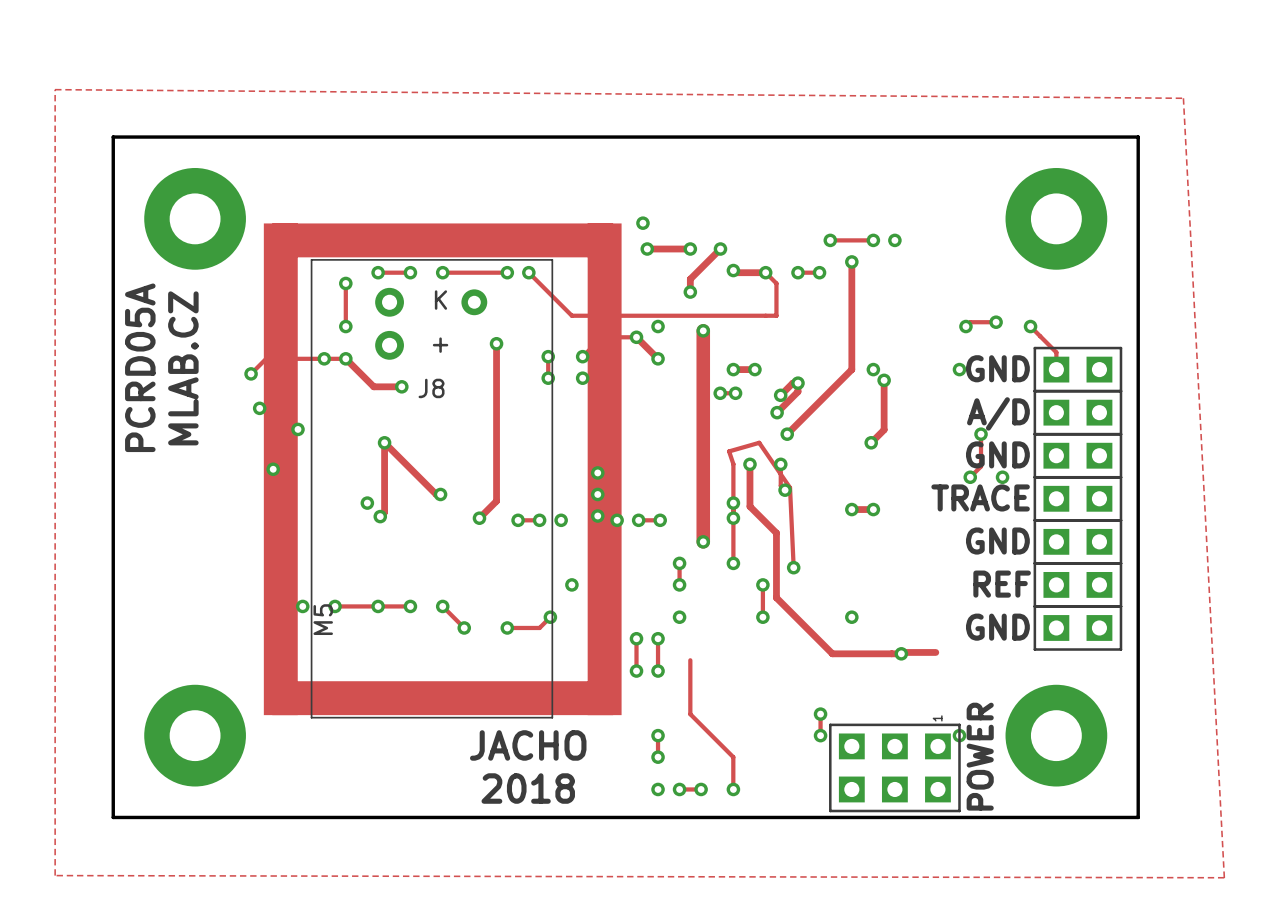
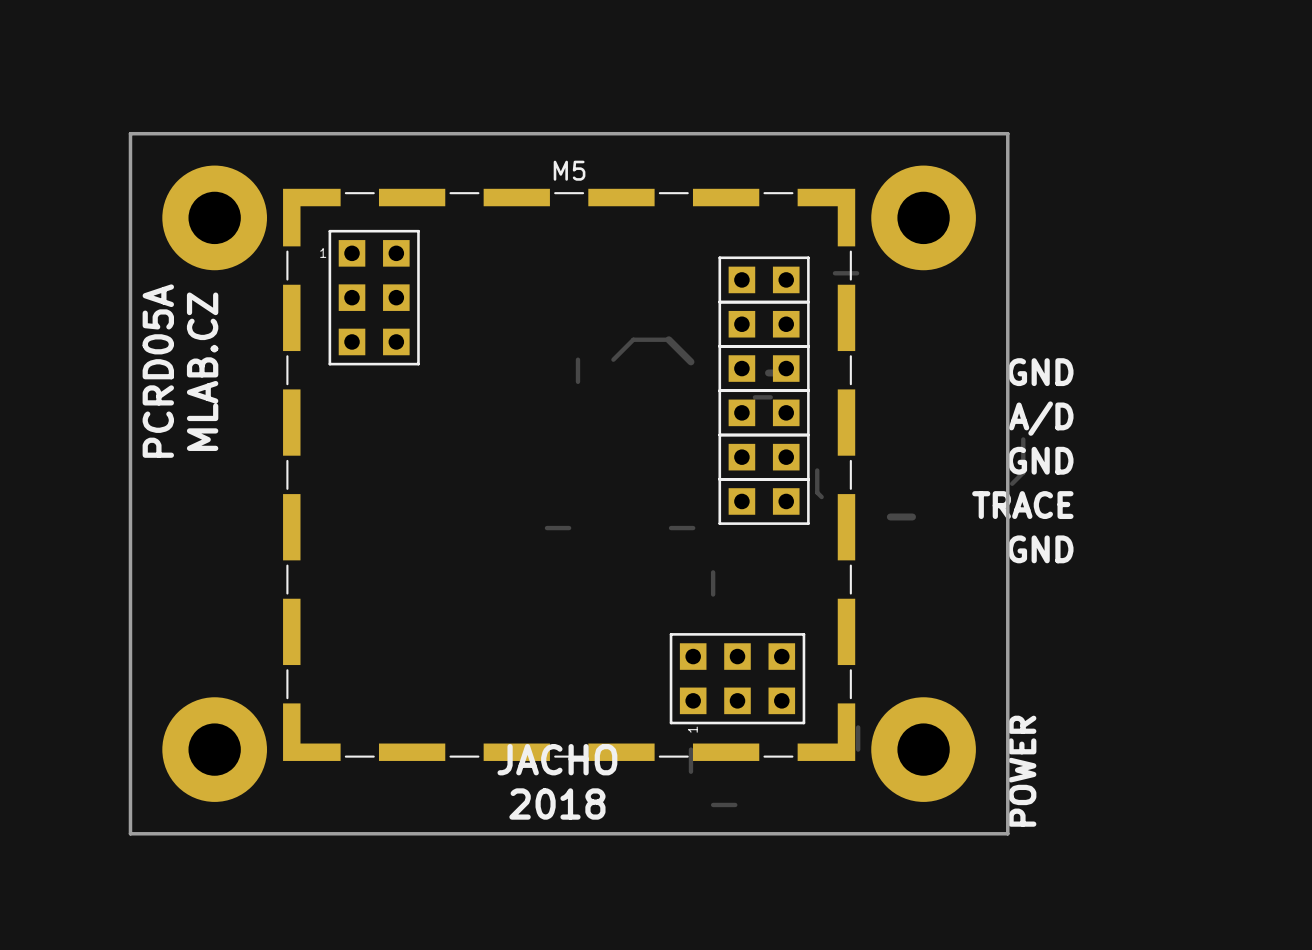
zone outline: (55, 89) (1183, 98) (1224, 877) (55, 875) (55, 89) -> none
board edge: (965, 137) (1138, 137) (1138, 817) (965, 817) -> (1007, 133) (1007, 833)
part position: (1056, 218) -> (923, 217)
M5 footprint: [263, 223, 622, 716] -> [283, 188, 856, 761]
via: (642, 223) -> none
track: (830, 240) (873, 240) -> none
via: (830, 240) -> none
via: (873, 240) -> none
via: (894, 240) -> none
track: (647, 249) (690, 249) -> none
via: (647, 249) -> none
via: (690, 249) -> none
track: (720, 249) (690, 279) (690, 292) -> none
via: (720, 249) -> none
track: (851, 261) (851, 369) (787, 434) -> none
via: (851, 261) -> none
track: (733, 270) (735, 272) (765, 272) (776, 283) (776, 315) (571, 315) (528, 272) -> none
via: (733, 270) -> none
track: (378, 272) (410, 272) -> none
via: (378, 272) -> none
via: (410, 272) -> none
track: (442, 272) (507, 272) -> none
via: (442, 272) -> none
via: (507, 272) -> none
via: (528, 272) -> none
via: (765, 272) -> none
via: (798, 272) -> none
via: (819, 272) -> none
part: none -> (764, 279)
track: (345, 283) (345, 326) -> none
via: (345, 283) -> none
via: (690, 292) -> none
part: none -> (374, 297)
text: K (440, 300) -> none
part: none -> (764, 324)
track: (996, 322) (970, 322) (965, 326) -> none
via: (996, 322) -> none
via: (345, 326) -> none
via: (658, 326) -> none
via: (965, 326) -> none
track: (1030, 326) (1056, 352) (1056, 369) -> none
via: (1030, 326) -> none
track: (703, 330) (703, 541) -> none
via: (703, 330) -> none
via: (636, 337) -> none
track: (496, 343) (496, 501) (479, 518) -> none
via: (496, 343) -> none
text: + (440, 345) -> none
via: (548, 356) -> none
via: (582, 356) -> none
via: (324, 358) -> none
via: (345, 358) -> none
via: (658, 358) -> none
part: none -> (764, 368)
via: (733, 369) -> none
via: (754, 369) -> none
via: (873, 369) -> none
via: (959, 369) -> none
part: (1077, 369) -> none
track: (251, 373) (266, 358) (345, 358) (373, 386) (401, 386) -> none
via: (251, 373) -> none
via: (548, 378) -> none
via: (582, 378) -> none
track: (884, 380) (884, 429) (871, 442) -> none
via: (884, 380) -> none
via: (798, 383) -> none
via: (401, 386) -> none
via: (720, 393) -> none
via: (735, 393) -> none
track: (780, 395) (792, 383) (798, 383) (798, 391) (777, 412) -> none
via: (780, 395) -> none
via: (259, 408) -> none
part: none -> (764, 412)
via: (777, 412) -> none
part: (1077, 412) -> none
via: (297, 429) -> none
via: (787, 434) -> none
via: (981, 434) -> none
via: (384, 442) -> none
via: (871, 442) -> none
part: none -> (764, 457)
part: (1077, 455) -> none
track: (749, 464) (749, 506) (776, 533) (776, 597) (832, 653) (935, 652) -> none
via: (749, 464) -> none
via: (780, 464) -> none
via: (273, 469) -> none
via: (597, 472) -> none
via: (970, 477) -> none
via: (1002, 477) -> none
J8: (431, 488) -> none
via: (785, 490) -> none
track: (440, 494) (436, 494) (384, 442) (384, 512) (380, 516) -> none
via: (440, 494) -> none
via: (597, 494) -> none
part: none -> (764, 501)
part: (1077, 498) -> none
via: (367, 503) -> none
via: (733, 503) -> none
via: (851, 509) -> none
via: (873, 509) -> none
via: (380, 516) -> none
via: (597, 516) -> none
via: (479, 518) -> none
via: (733, 518) -> none
via: (518, 520) -> none
via: (539, 520) -> none
via: (561, 520) -> none
via: (617, 520) -> none
via: (638, 520) -> none
via: (660, 520) -> none
via: (703, 541) -> none
part: (1077, 541) -> none
via: (679, 563) -> none
track: (733, 563) (733, 464) (729, 451) (759, 442) (790, 487) (793, 567) -> none
via: (733, 563) -> none
via: (793, 567) -> none
via: (571, 584) -> none
via: (679, 584) -> none
track: (762, 584) (762, 617) -> none
via: (762, 584) -> none
text: REF (1002, 584) -> none
part: (1077, 584) -> none
via: (302, 606) -> none
track: (335, 606) (410, 606) -> none
via: (335, 606) -> none
via: (378, 606) -> none
via: (410, 606) -> none
track: (442, 606) (464, 627) -> none
via: (442, 606) -> none
track: (550, 617) (539, 627) (507, 627) -> none
via: (550, 617) -> none
via: (679, 617) -> none
via: (762, 617) -> none
via: (851, 617) -> none
M5 name position: M5 (323, 619) -> M5 (569, 170)
via: (464, 627) -> none
via: (507, 627) -> none
text: GND (997, 627) -> none
part: (1077, 627) -> none
track: (636, 638) (636, 671) -> none
via: (636, 638) -> none
track: (658, 638) (658, 671) -> none
via: (658, 638) -> none
via: (901, 653) -> none
track: (690, 660) (690, 714) (733, 757) (733, 789) -> none
via: (636, 671) -> none
via: (658, 671) -> none
via: (820, 714) -> none
via: (658, 735) -> none
via: (820, 735) -> none
via: (959, 735) -> none
part position: (1056, 735) -> (923, 749)
via: (658, 757) -> none
part rotation: 0° (894, 767) -> 180° (737, 678)
part position: (894, 767) -> (737, 678)
via: (658, 789) -> none
via: (679, 789) -> none
via: (701, 789) -> none
via: (733, 789) -> none

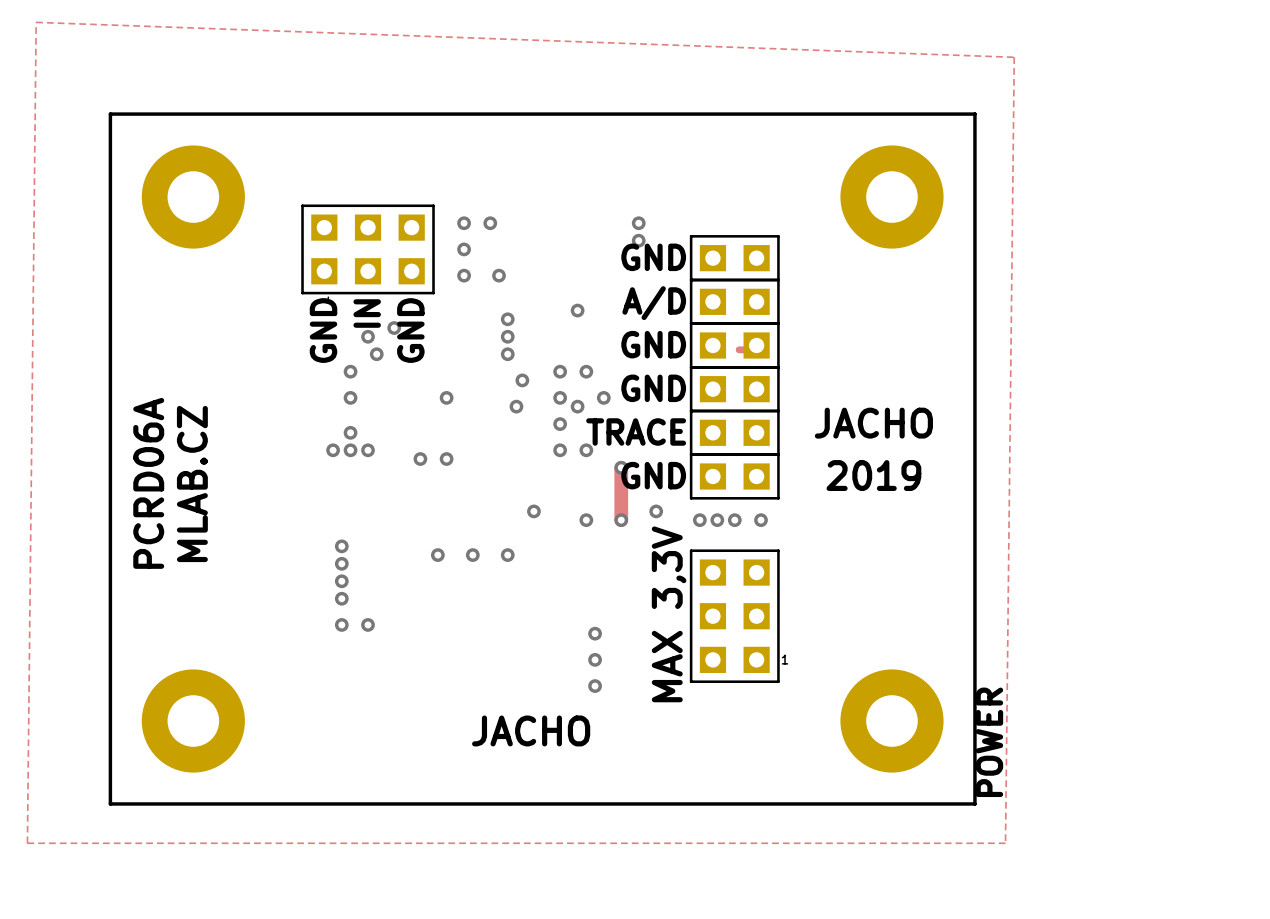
zone outline: none -> (36, 22) (27, 843) (1005, 843) (1014, 57) (36, 22)
via: none -> (464, 223)
via: none -> (490, 223)
via: none -> (638, 223)
via: none -> (638, 240)
via: none -> (464, 249)
track: (834, 273) (857, 273) -> none
text: none -> GND (653, 257)
part rotation: 0° (374, 297) -> 90° counterclockwise (368, 249)
via: none -> (464, 275)
via: none -> (499, 275)
via: none -> (577, 310)
text: none -> IN (367, 313)
via: none -> (507, 319)
via: none -> (394, 328)
text: none -> GND (323, 330)
text: none -> GND (410, 330)
via: none -> (368, 336)
via: none -> (507, 336)
track: (577, 359) (577, 381) -> none
track: (613, 359) (633, 339) (668, 339) (690, 361) -> none
text: none -> GND (653, 344)
text: PCRD05A (158, 371) -> PCRD06A (148, 483)
text position: MLAB.CZ (202, 371) -> MLAB.CZ (192, 483)
text: GND (1040, 372) -> none
via: none -> (376, 354)
via: none -> (507, 354)
via: none -> (350, 371)
via: none -> (560, 371)
via: none -> (586, 371)
track: (754, 397) (770, 397) -> none
via: none -> (522, 380)
text: none -> GND (653, 388)
text position: A/D (1041, 418) -> A/D (654, 303)
via: none -> (350, 397)
via: none -> (446, 397)
via: none -> (560, 397)
via: none -> (603, 397)
via: none -> (516, 406)
via: none -> (577, 406)
track: (1023, 439) (1023, 472) (1012, 483) -> none
text: none -> JACHO (873, 423)
via: none -> (560, 424)
via: none -> (350, 432)
text: GND (1040, 460) -> none
track: (817, 470) (817, 492) (821, 497) -> none
via: none -> (333, 450)
via: none -> (350, 450)
via: none -> (368, 450)
M5: (569, 474) -> none
via: none -> (560, 450)
via: none -> (586, 450)
via: none -> (420, 459)
via: none -> (446, 459)
track: none -> (621, 467) (621, 520)
via: none -> (621, 467)
text: none -> GND (653, 475)
text: none -> 2019 (873, 475)
text position: TRACE (1022, 505) -> TRACE (636, 431)
track: (890, 516) (912, 516) -> none
track: (546, 528) (569, 528) -> none
track: (671, 528) (693, 528) -> none
via: none -> (533, 511)
via: none -> (656, 511)
via: none -> (586, 520)
via: none -> (621, 520)
via: none -> (699, 520)
via: none -> (717, 520)
via: none -> (734, 520)
via: none -> (760, 520)
text: GND (1040, 549) -> none
via: none -> (341, 546)
track: (713, 572) (713, 594) -> none
via: none -> (437, 555)
via: none -> (472, 555)
via: none -> (507, 555)
via: none -> (341, 563)
via: none -> (341, 581)
via: none -> (341, 598)
text: none -> MAX 3,3V (669, 614)
via: none -> (341, 624)
via: none -> (368, 624)
via: none -> (595, 633)
part rotation: 0° (737, 678) -> 90° counterclockwise (734, 616)
via: none -> (595, 659)
via: none -> (595, 686)
track: (858, 727) (858, 749) -> none
track: (690, 749) (690, 771) -> none
text: 2018 (557, 804) -> none
track: (713, 804) (735, 804) -> none

